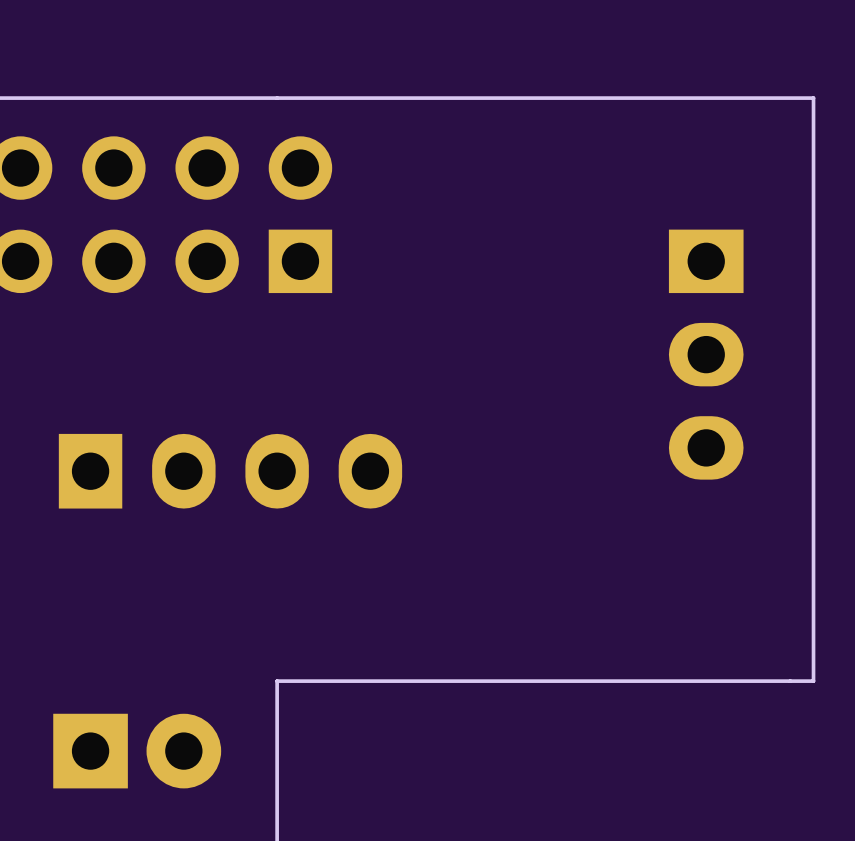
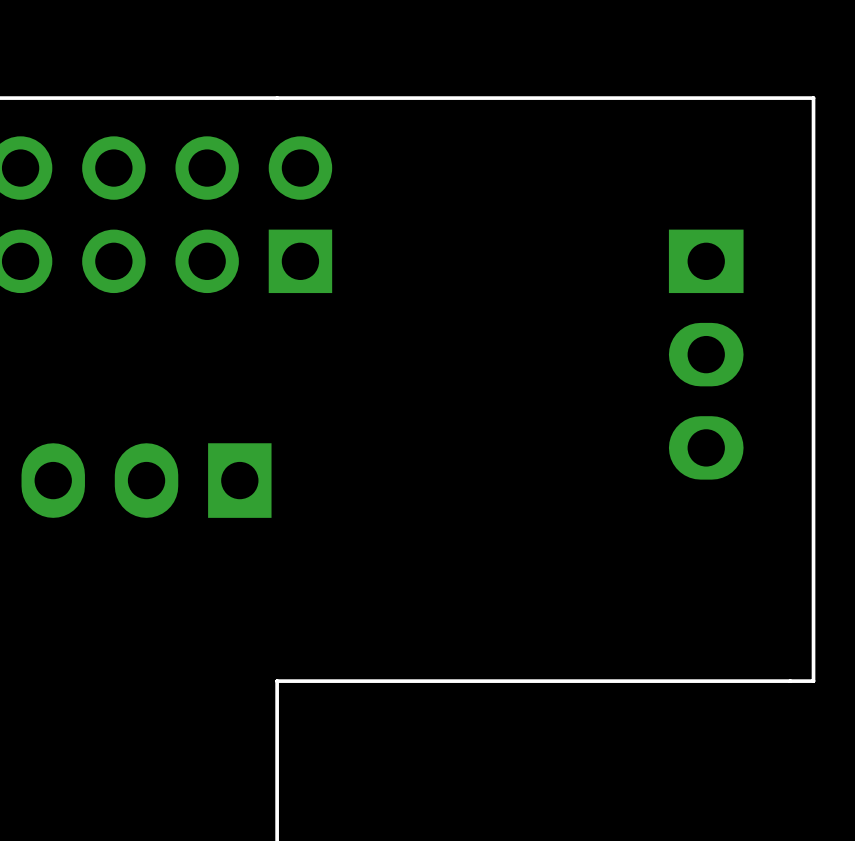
part: (230, 471) -> none
part: none -> (146, 480)
part: (137, 751) -> none

